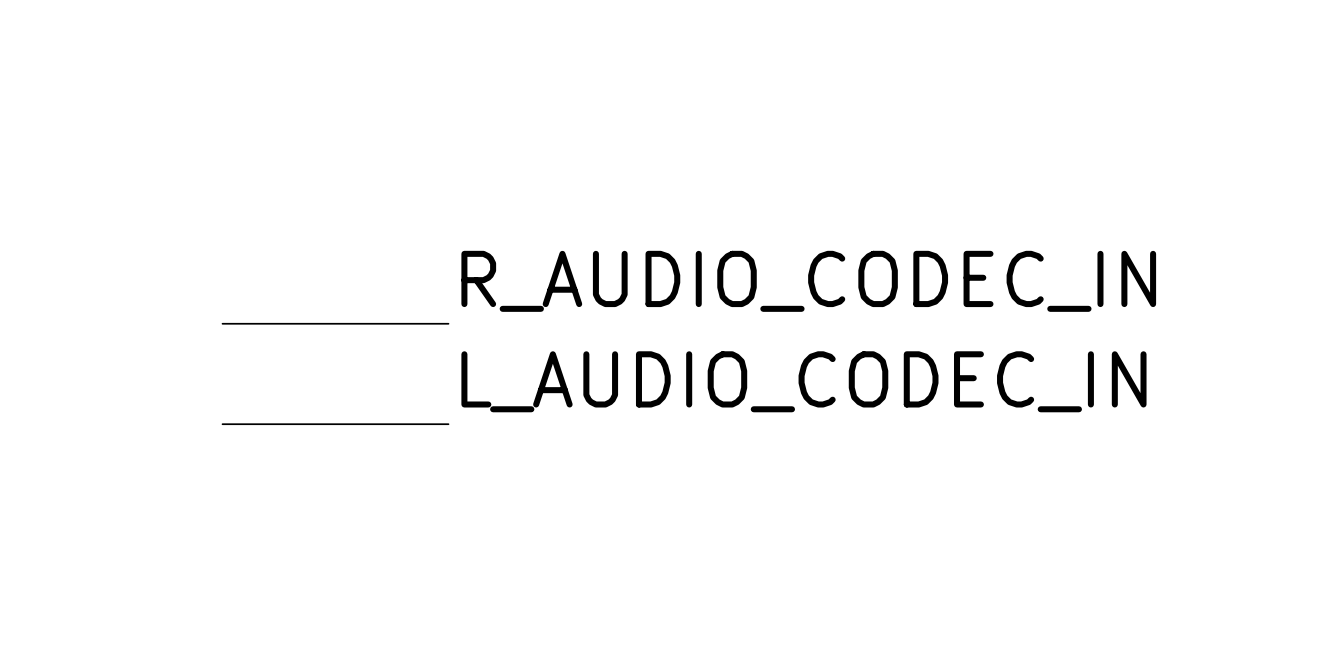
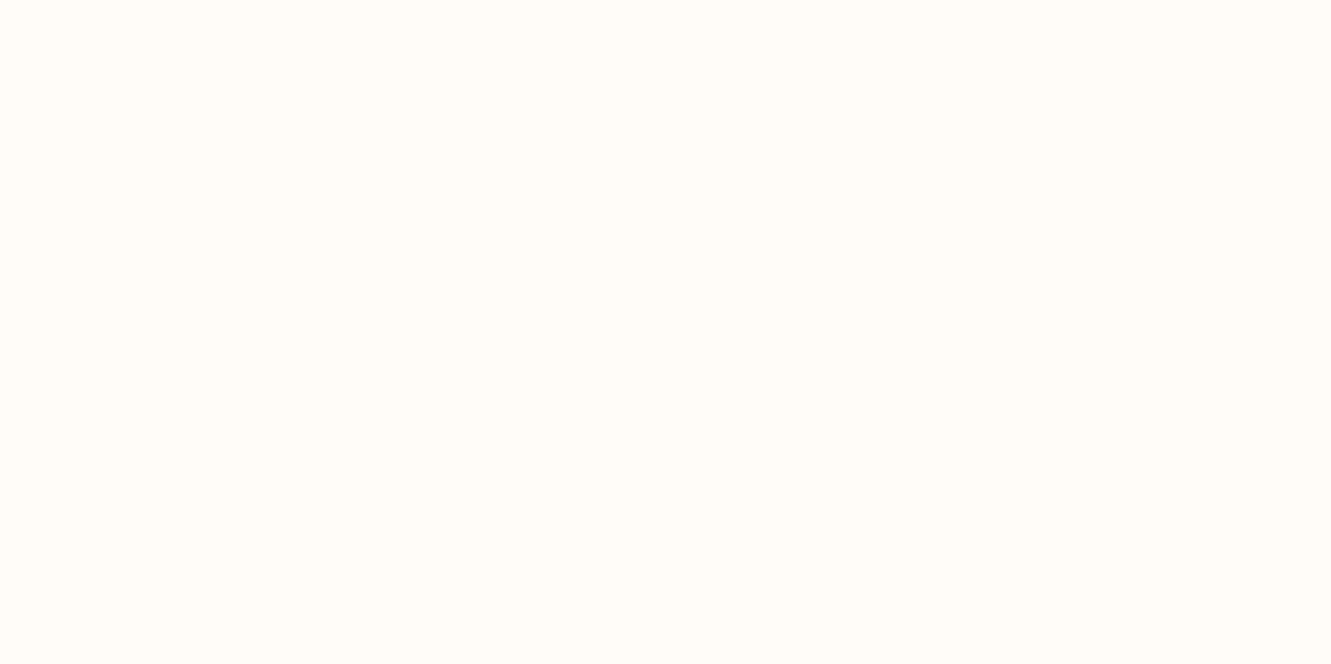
label: R_AUDIO_CODEC_IN (808, 281) -> none
wire: (222, 323) (448, 323) -> none
label: L_AUDIO_CODEC_IN (803, 381) -> none
wire: (222, 424) (448, 424) -> none

